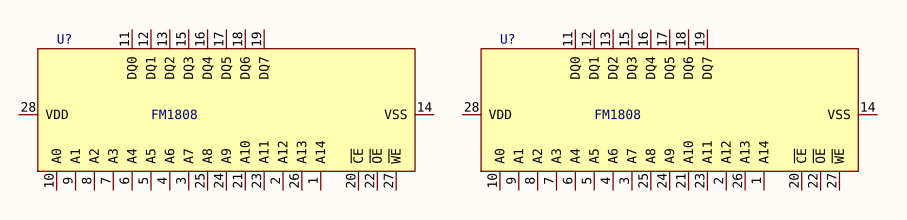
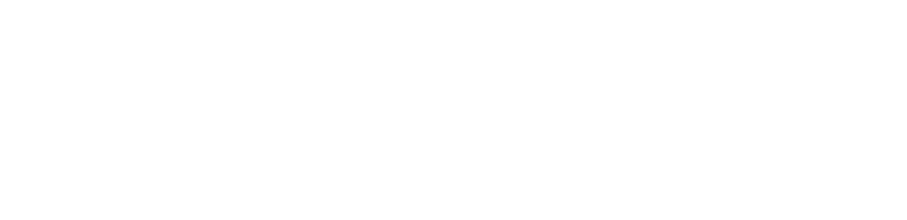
U?: FM1808 (226, 109) -> none
U?: FM1808 (669, 109) -> none

